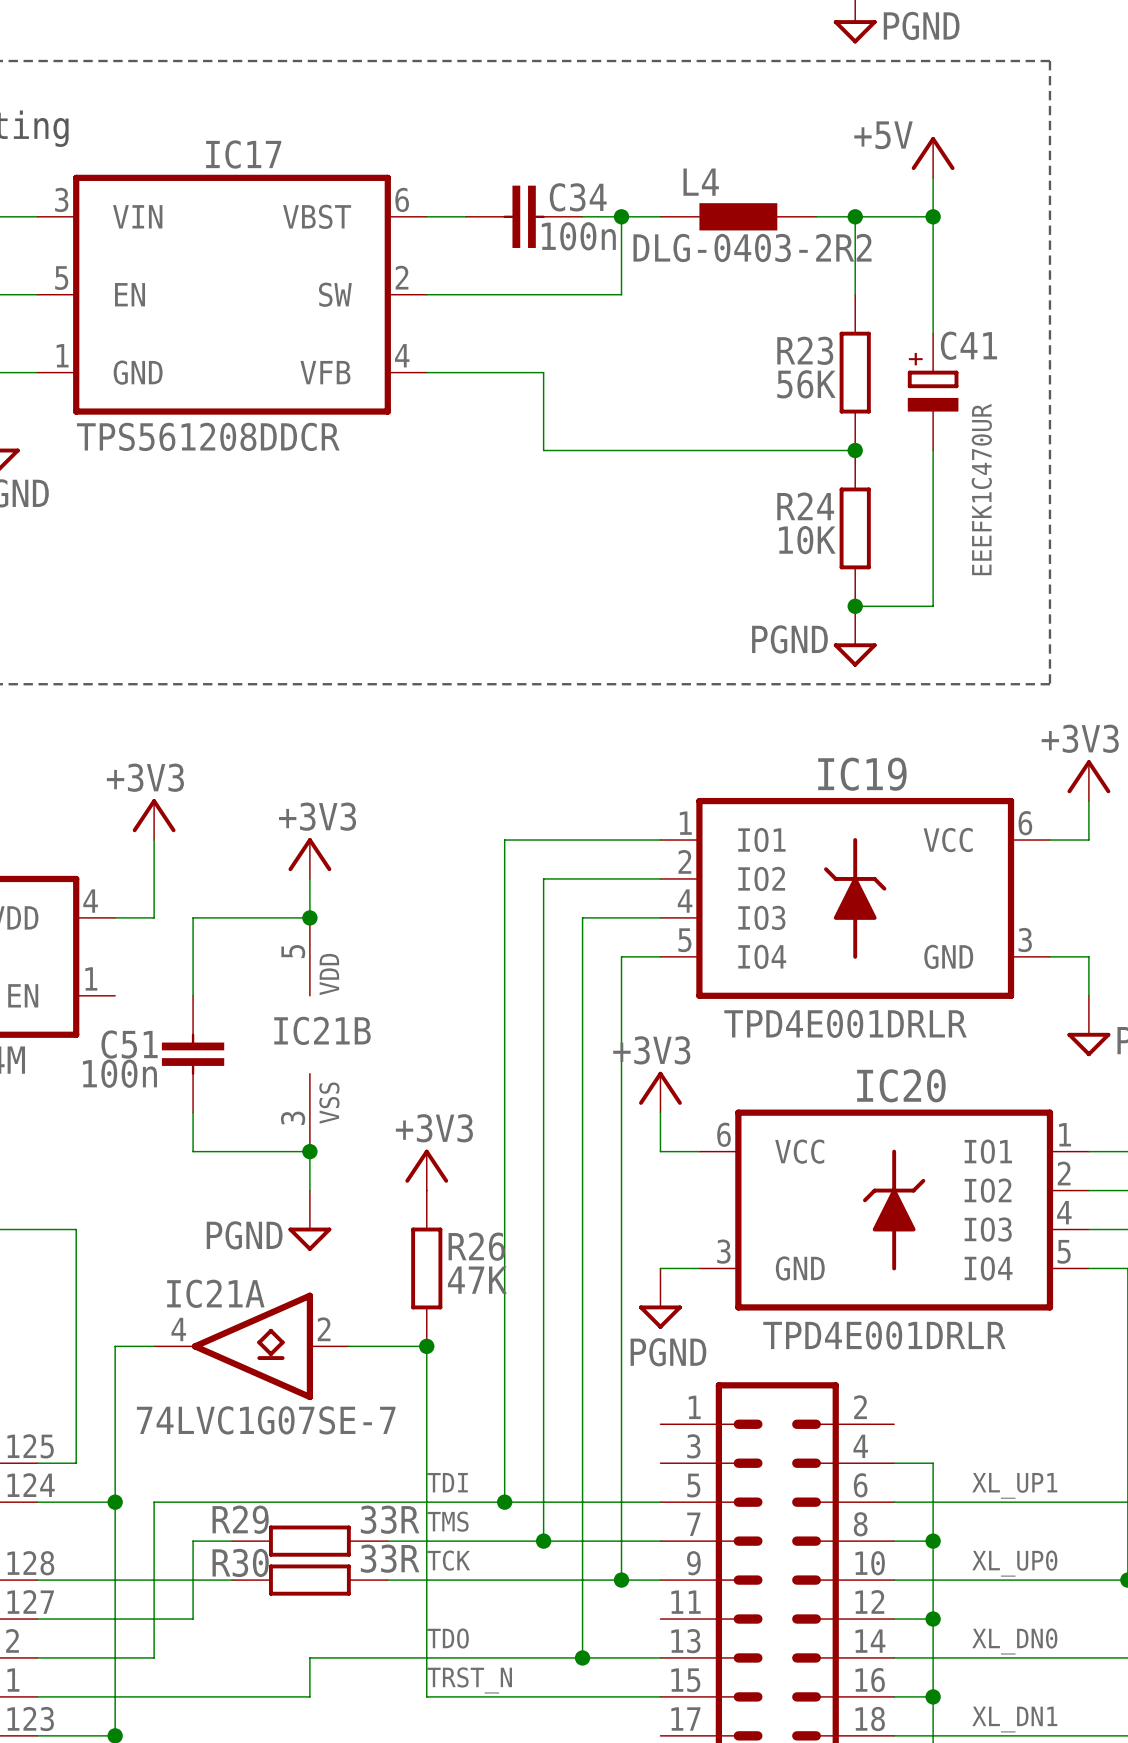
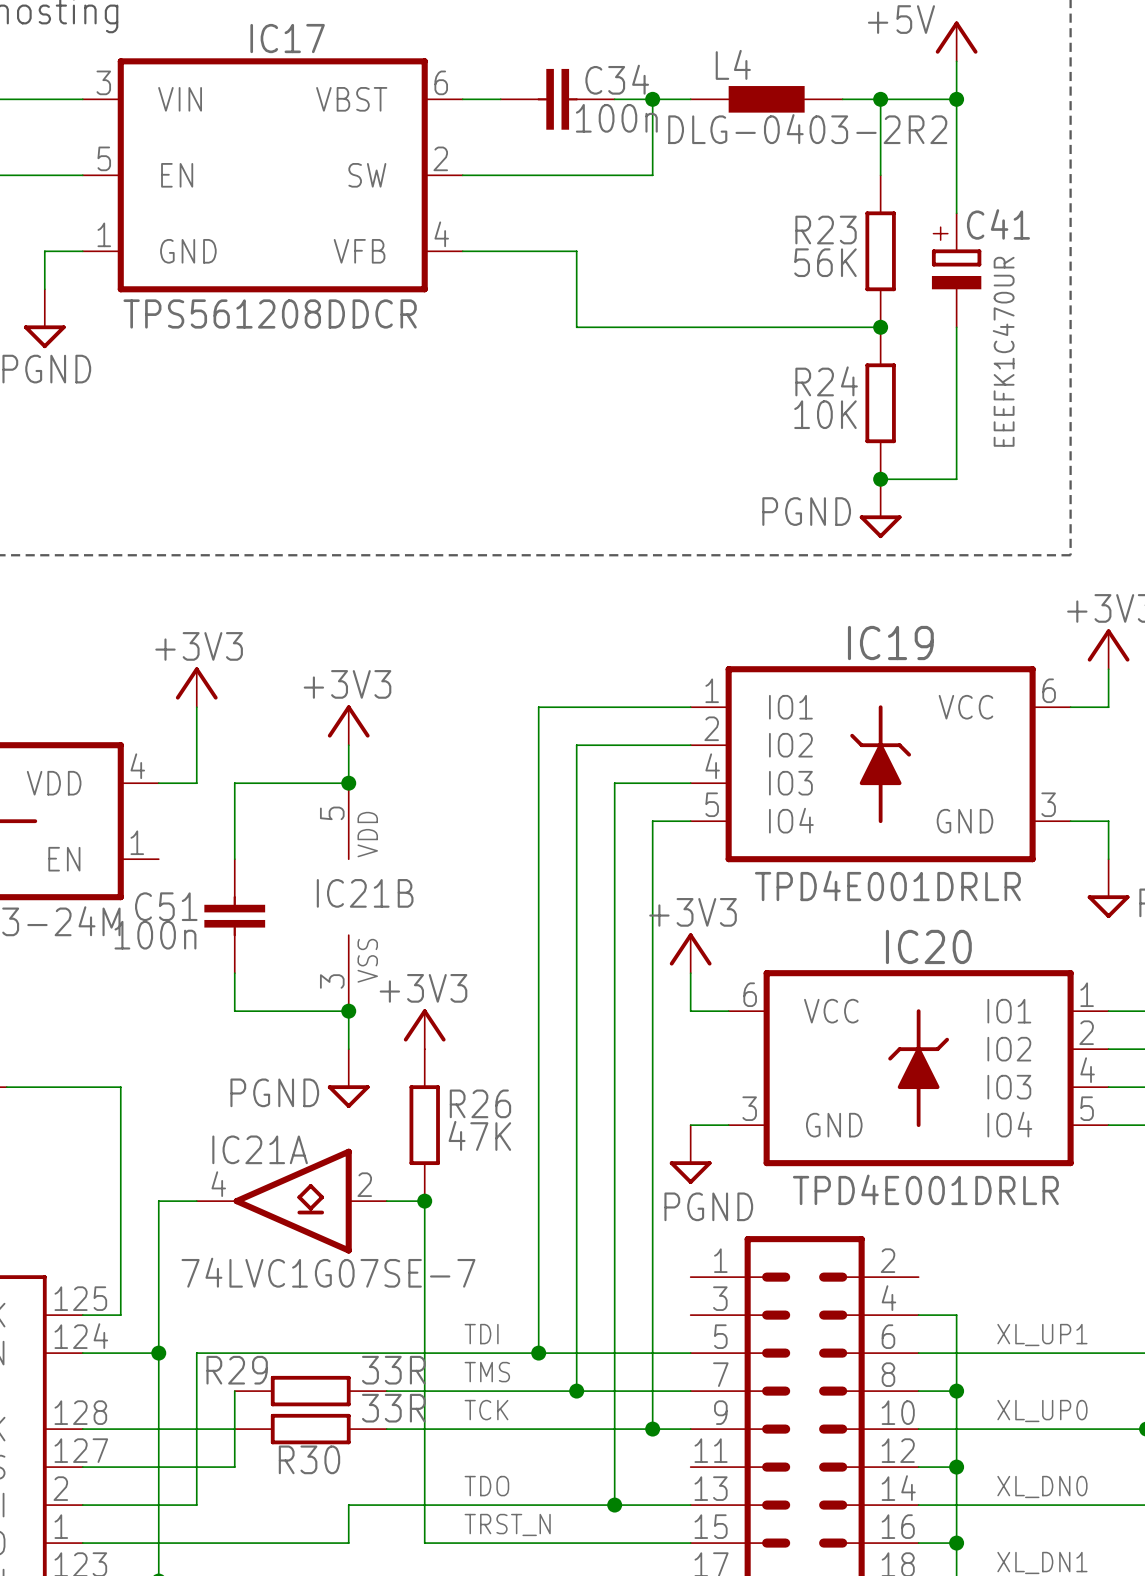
power symbol position: +3V3 (426, 1170) -> +3V3 (424, 1029)
R26 position: (426, 1268) -> (424, 1125)
wire: (387, 1346) (426, 1346) (426, 1696) -> (424, 1201) (424, 1543) (462, 1543)
junction position: (426, 1346) -> (424, 1201)
R29 position: (309, 1541) -> (310, 1391)
R30 name position: R30 (240, 1562) -> R30 (309, 1459)
R30 position: (309, 1580) -> (310, 1429)

